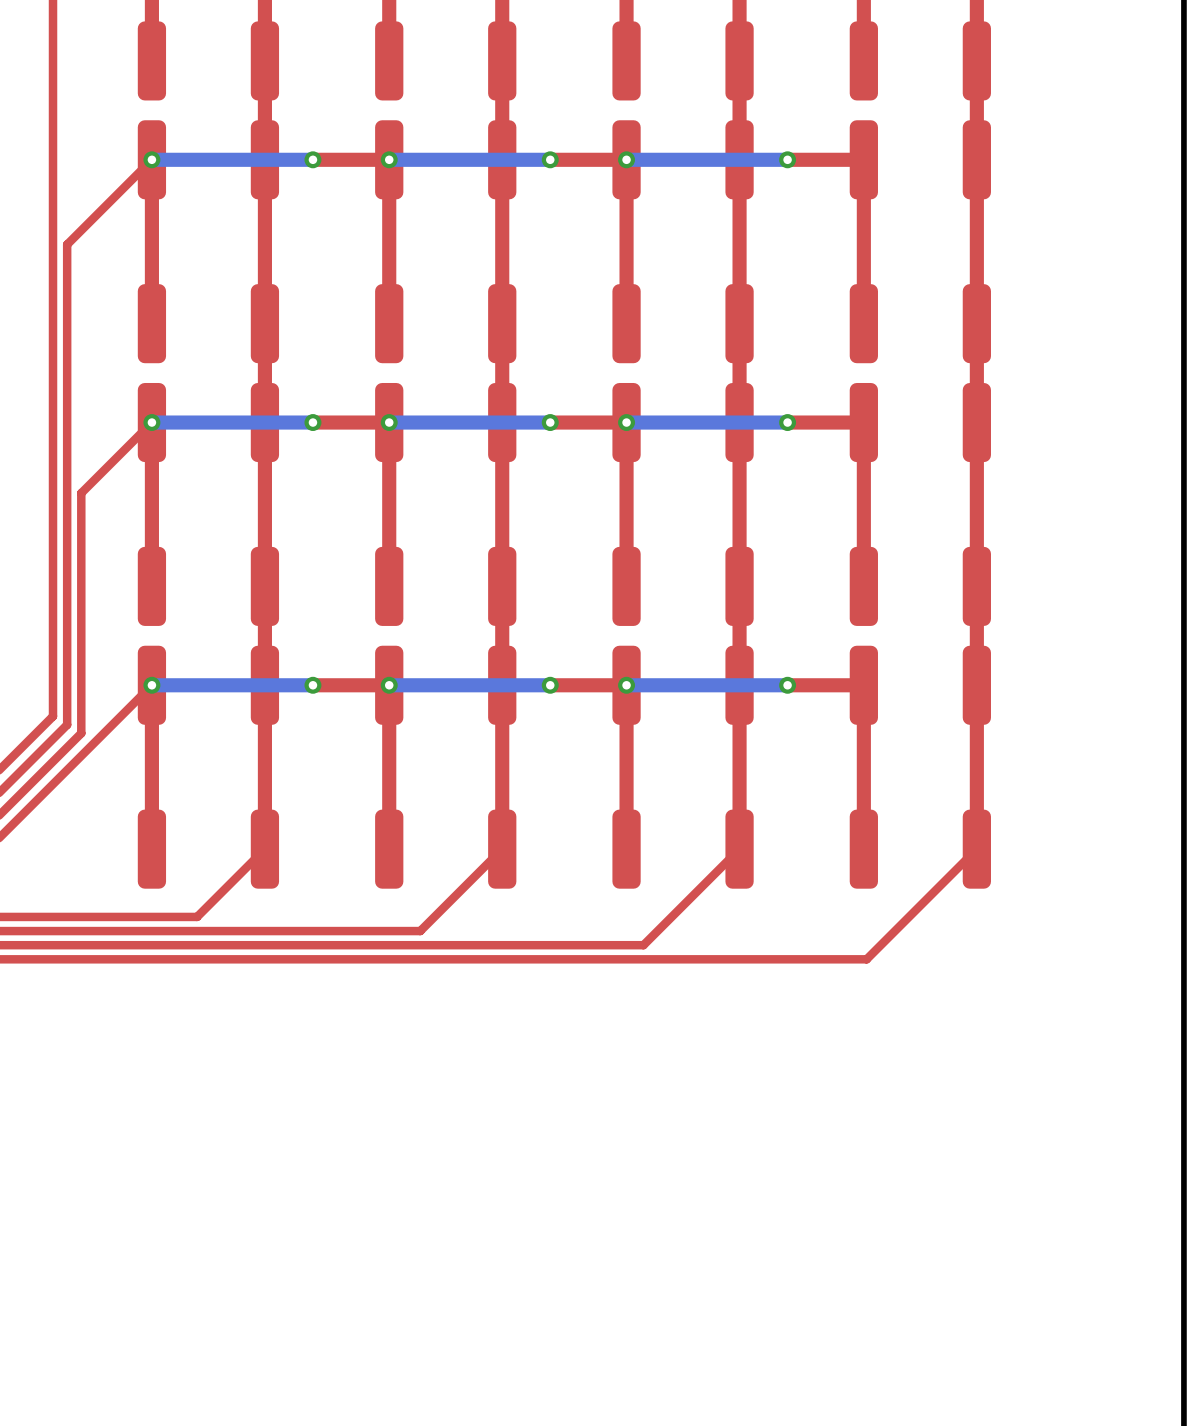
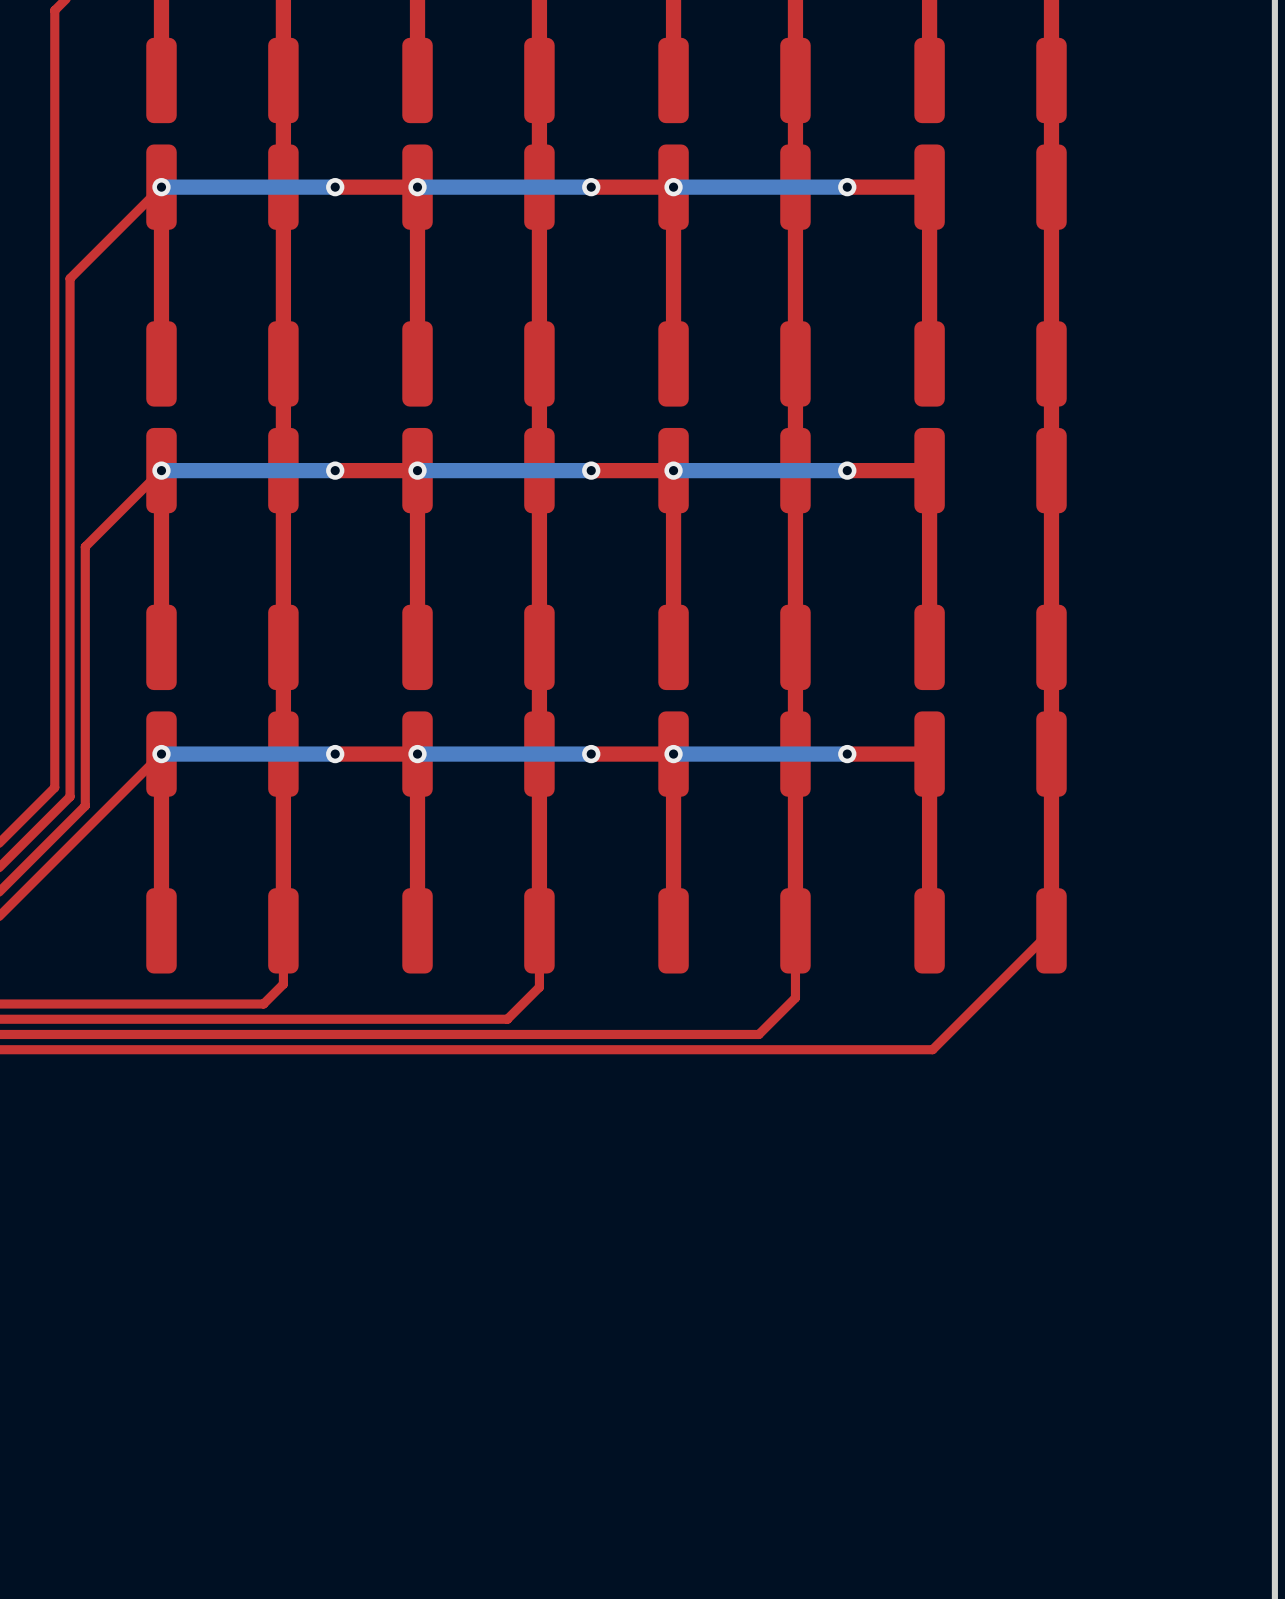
top track: (264, 849) (197, 916) -> (283, 930) (283, 984) (263, 1004) (210, 1004)
top track: (502, 849) (420, 931) -> (539, 930) (539, 987) (507, 1019) (451, 1019)
top track: (739, 849) (643, 945) -> (795, 930) (795, 997) (758, 1034) (691, 1034)

